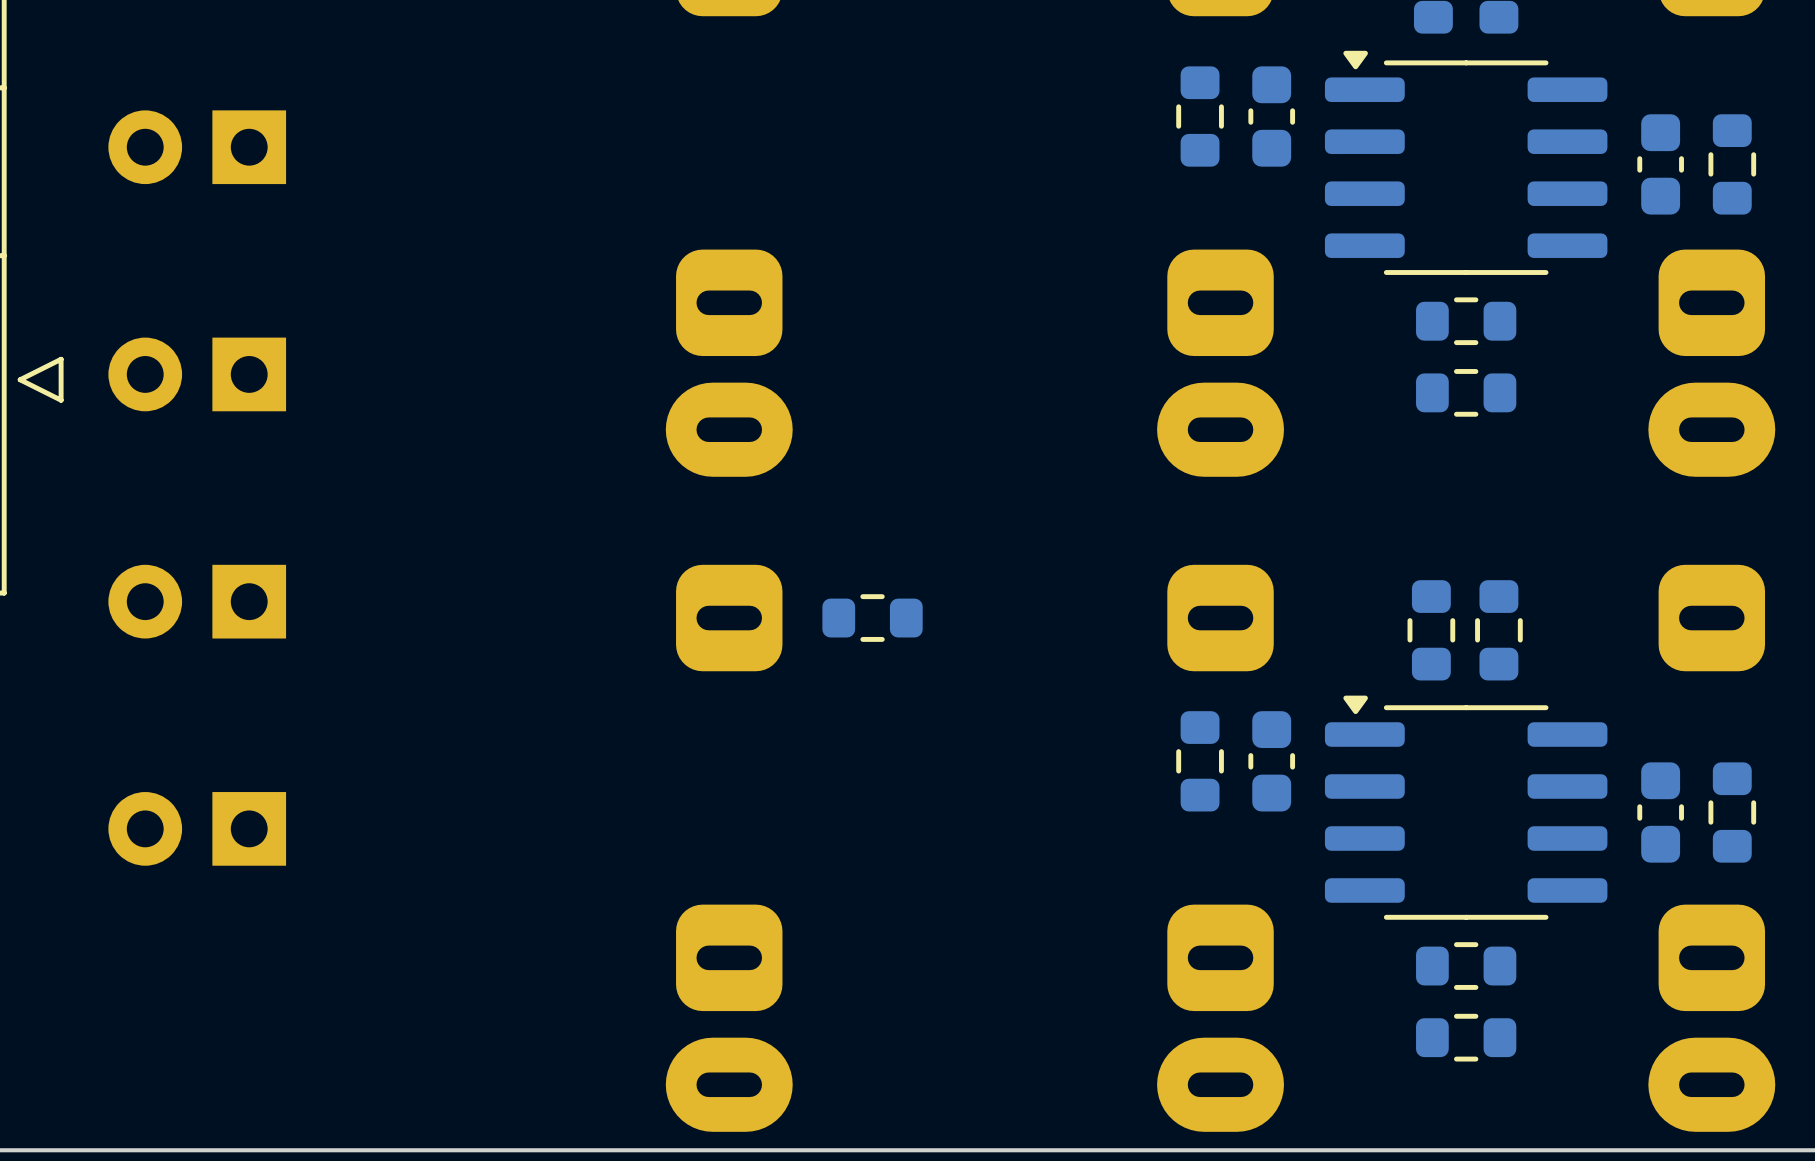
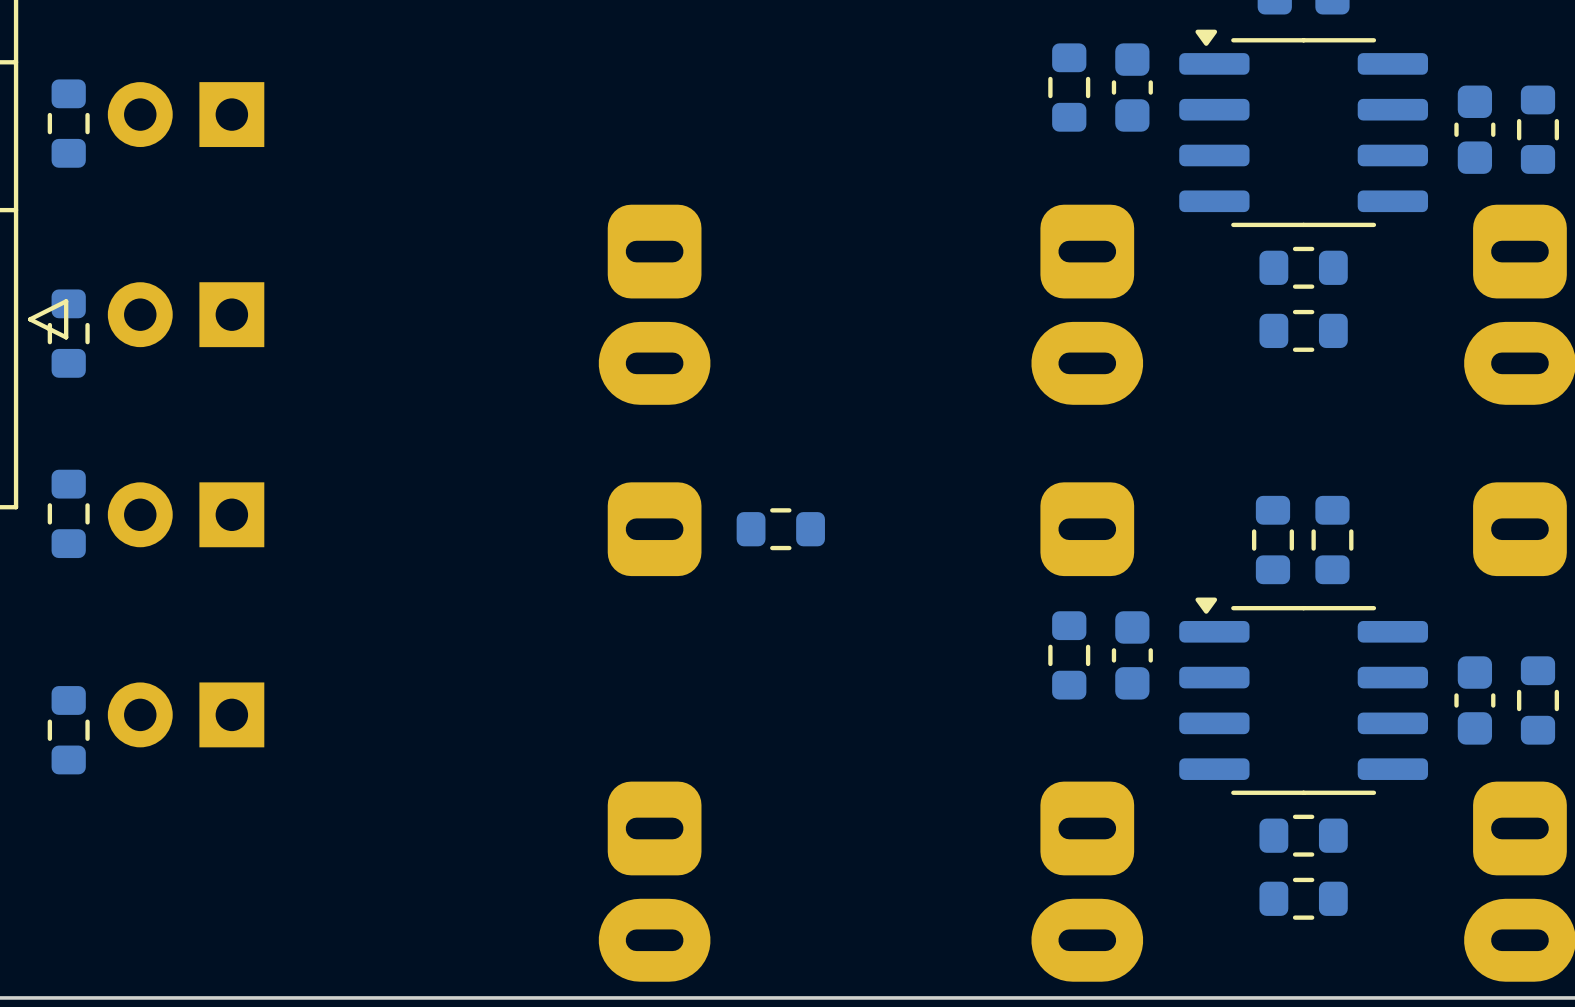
part: none -> (68, 123)
part: none -> (68, 333)
part: none -> (68, 513)
part: none -> (68, 730)

